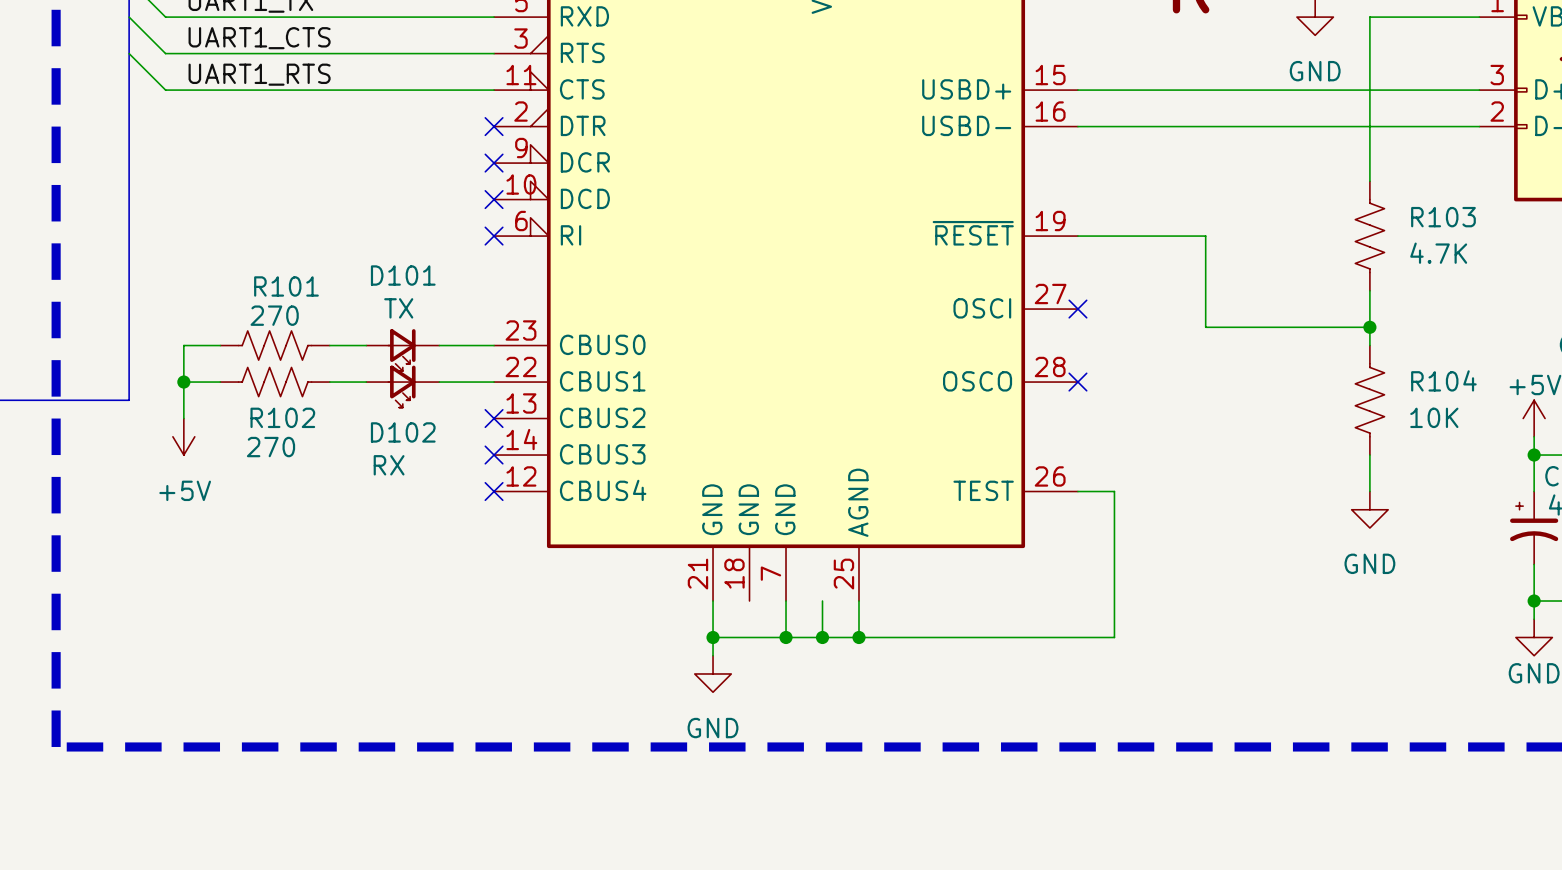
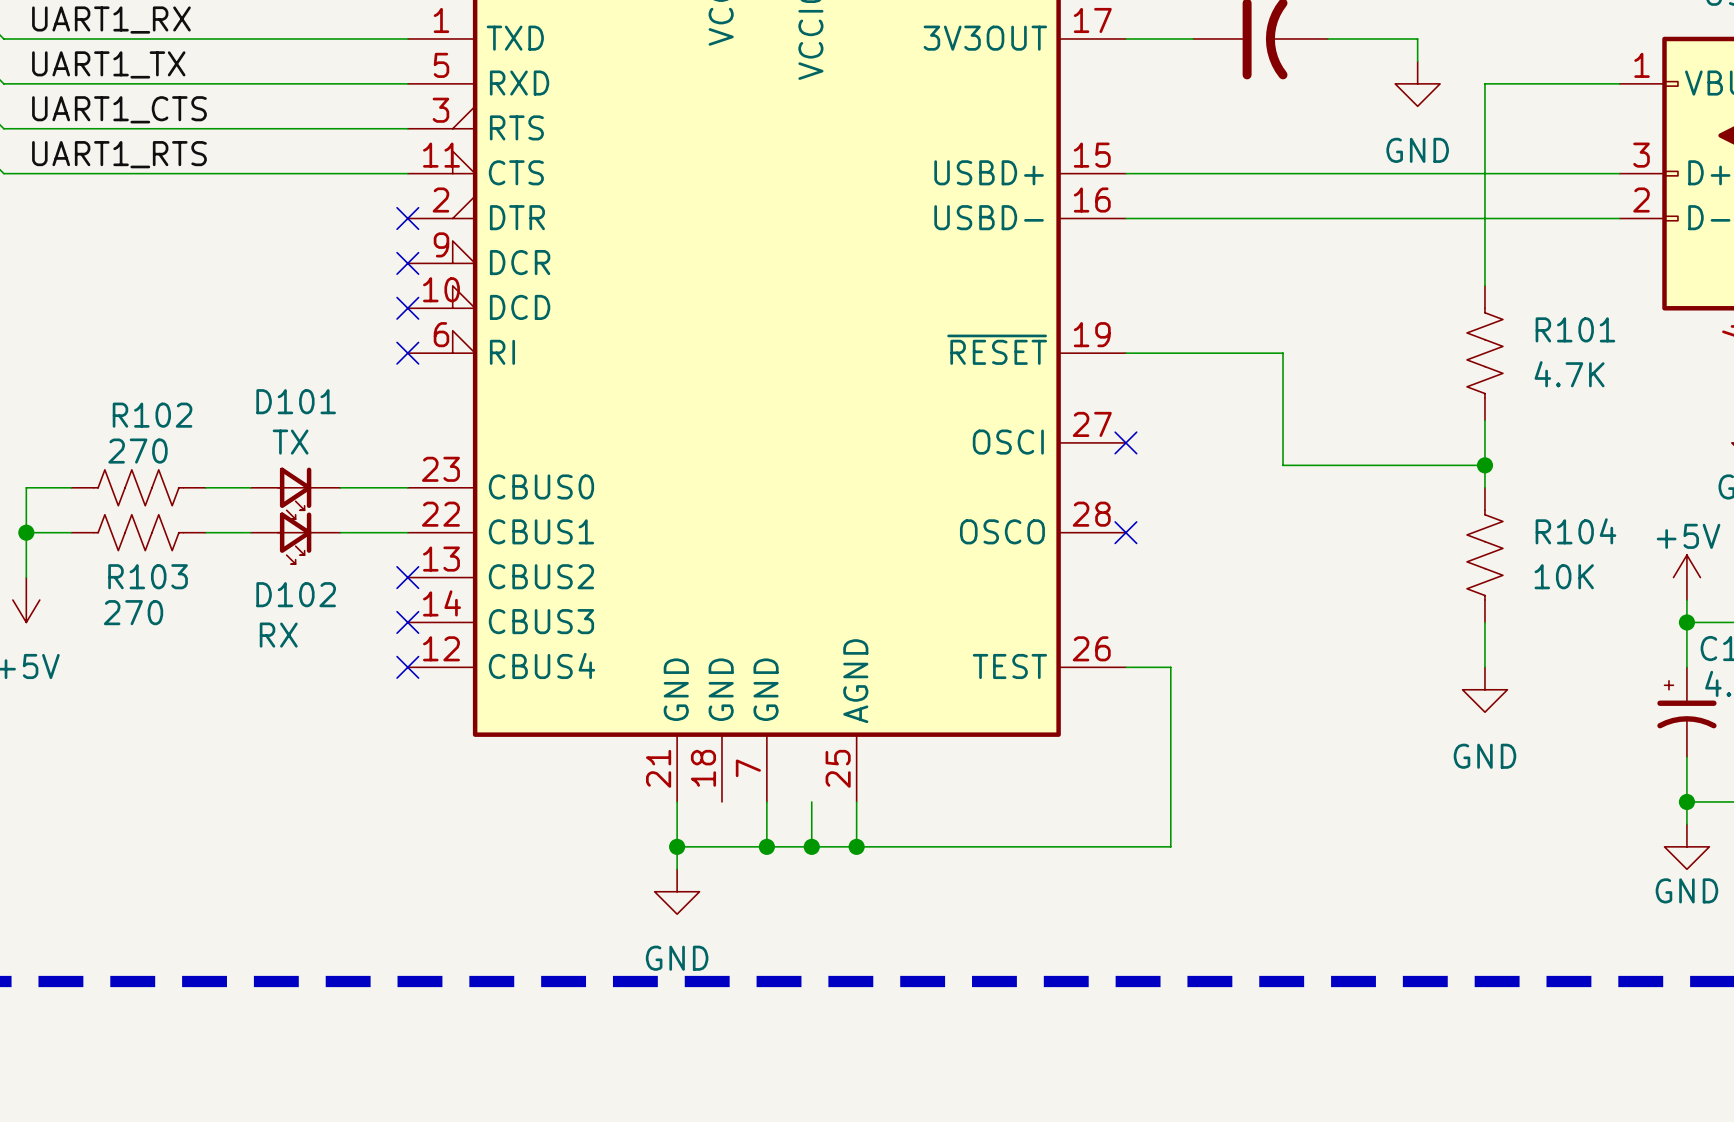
R103 name: R103 (1443, 217) -> R101 (1575, 329)
R101 name: R101 (286, 286) -> R102 (152, 415)
R102 name: R102 (282, 417) -> R103 (148, 576)

